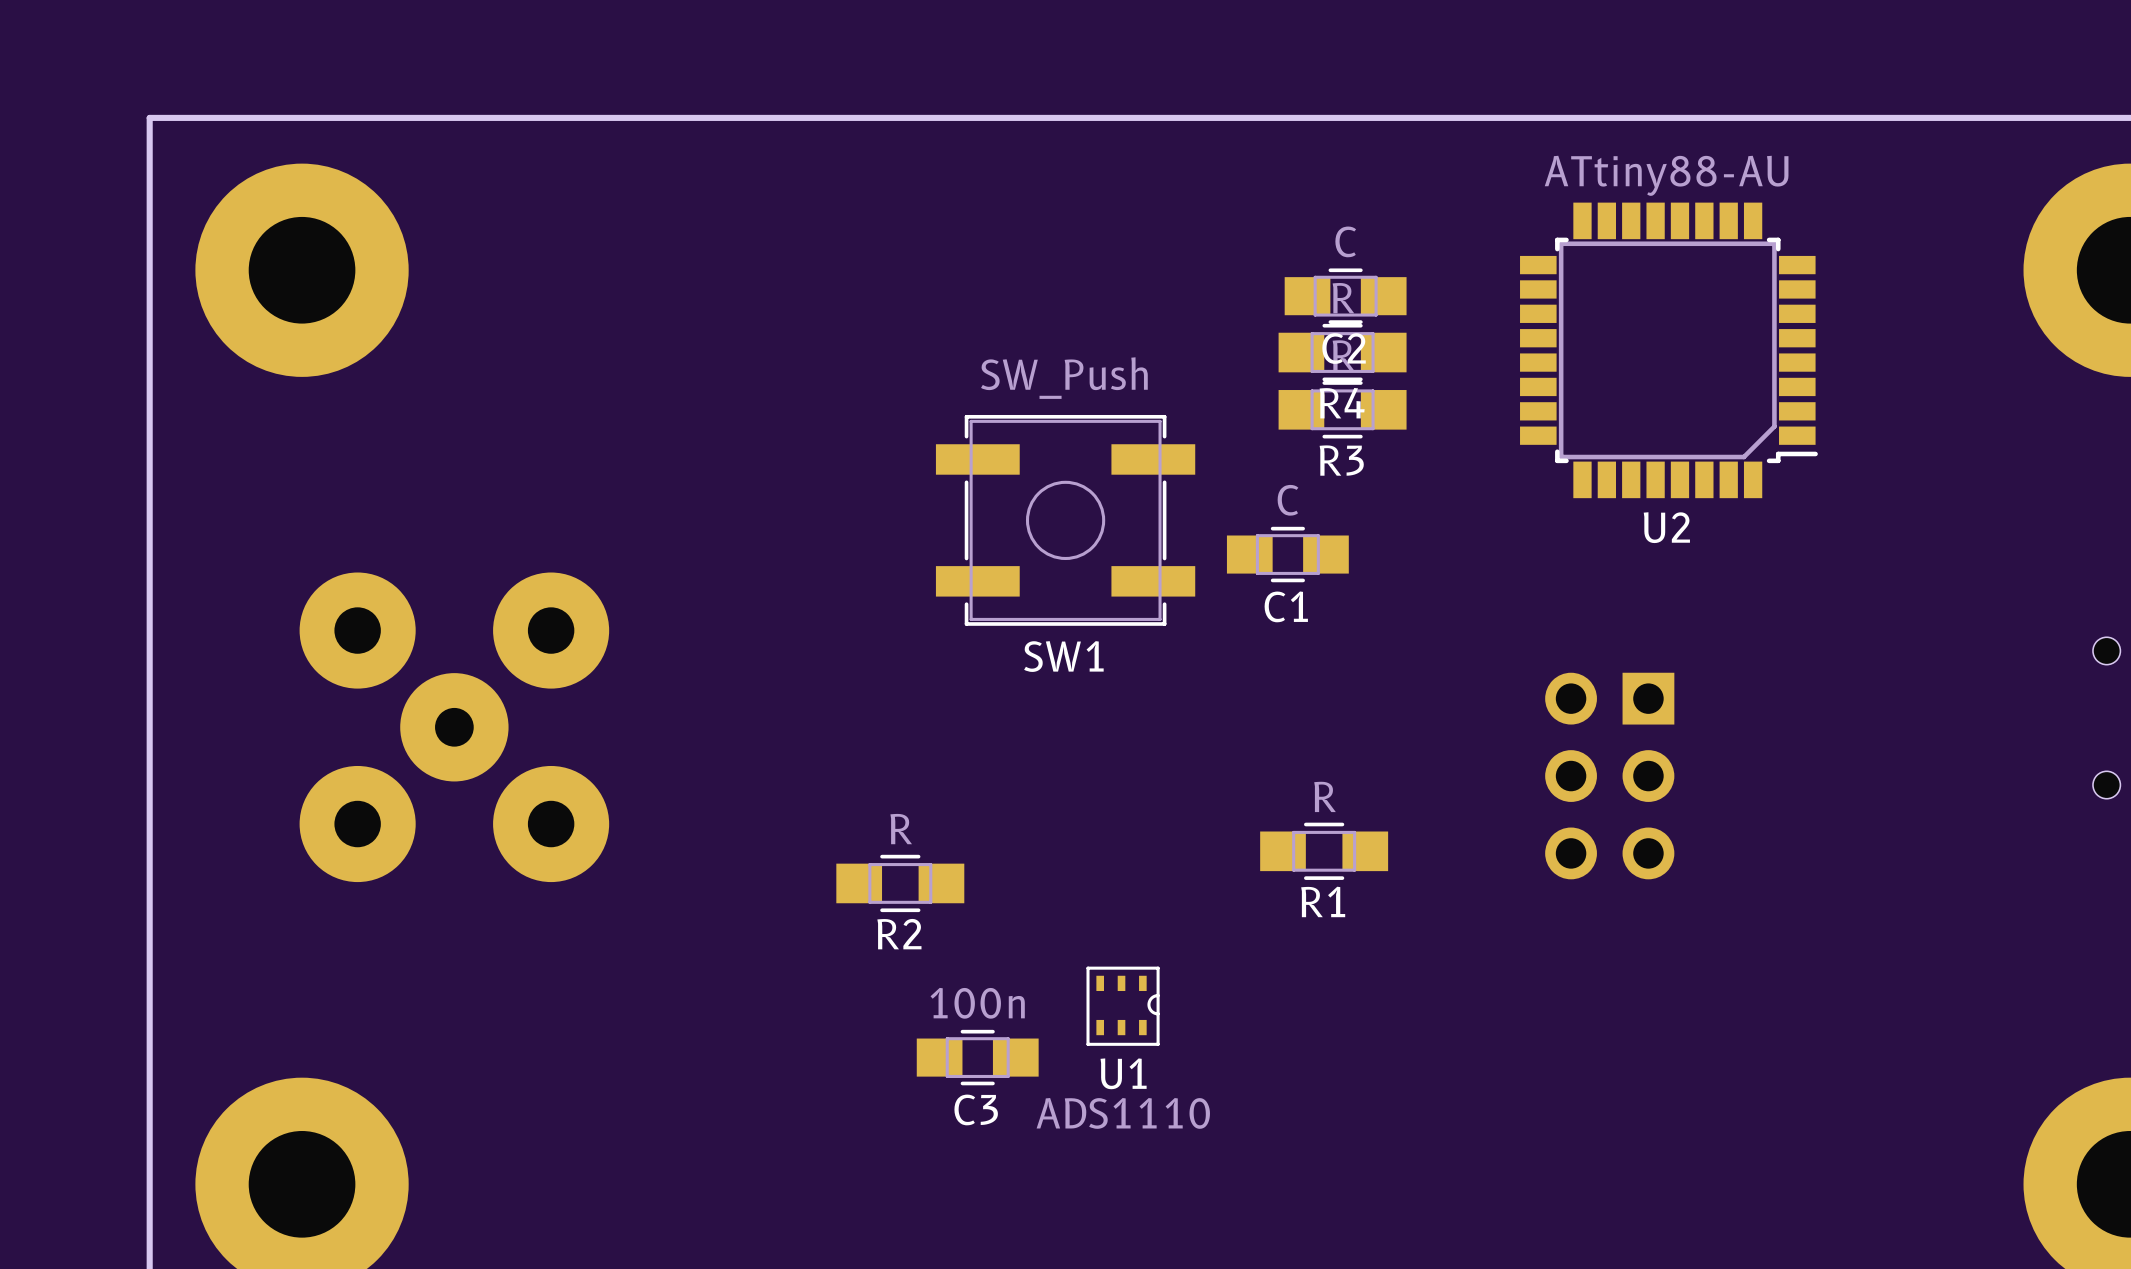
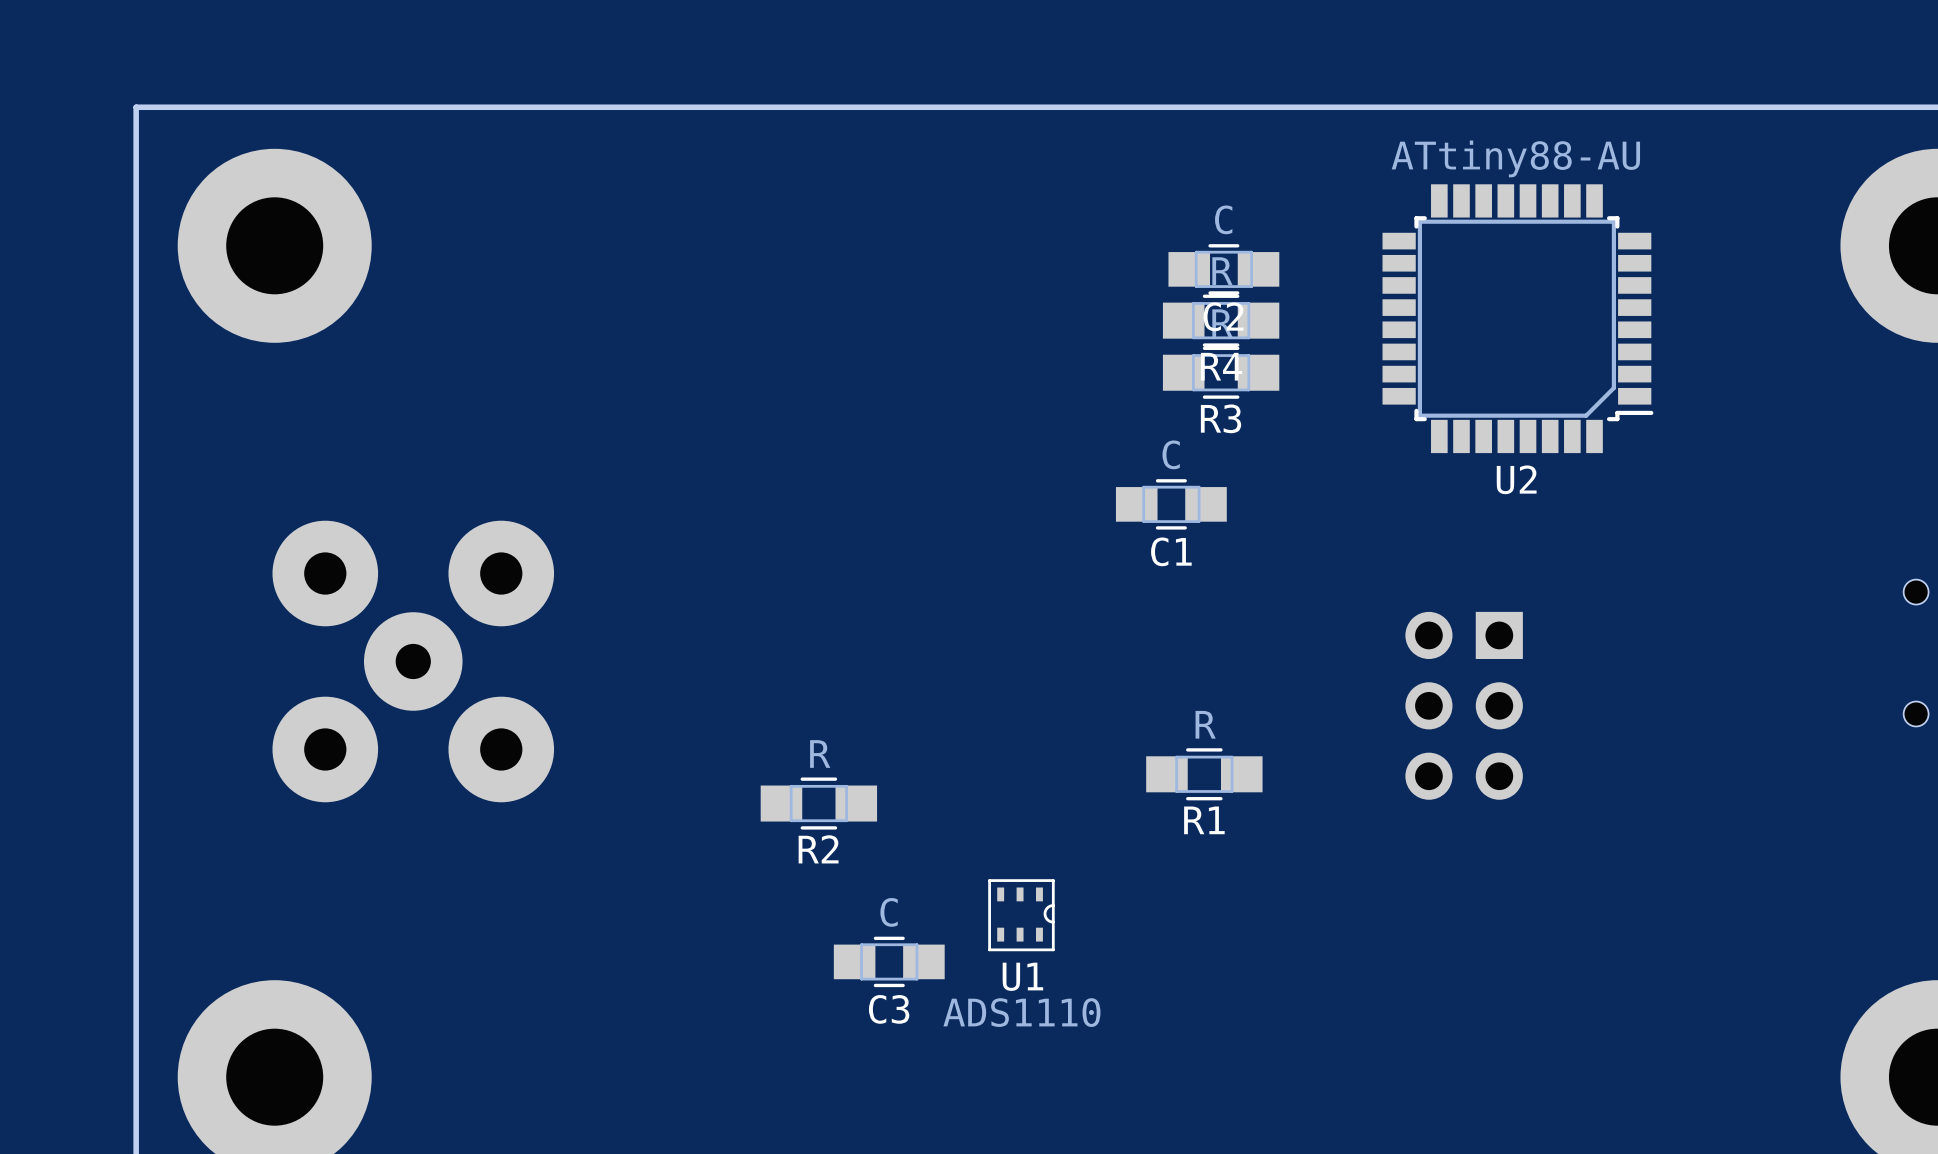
SW1: SW_Push (1065, 520) -> none
C3 value: 100n (977, 1003) -> C (889, 912)

